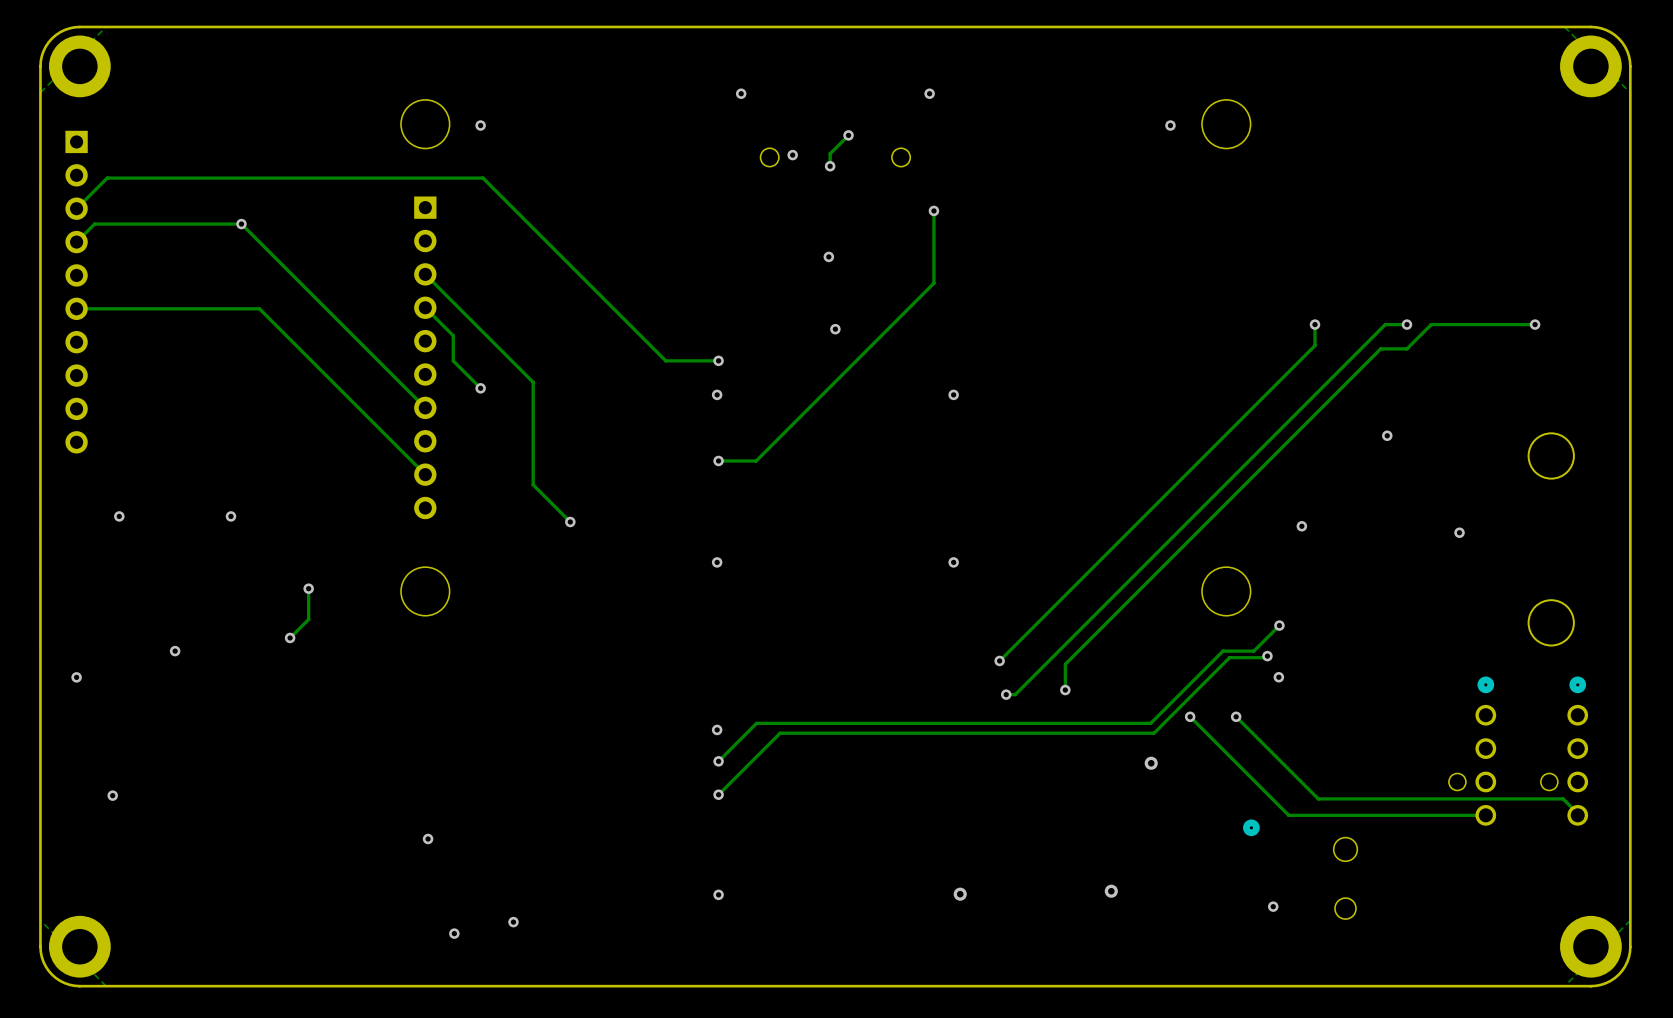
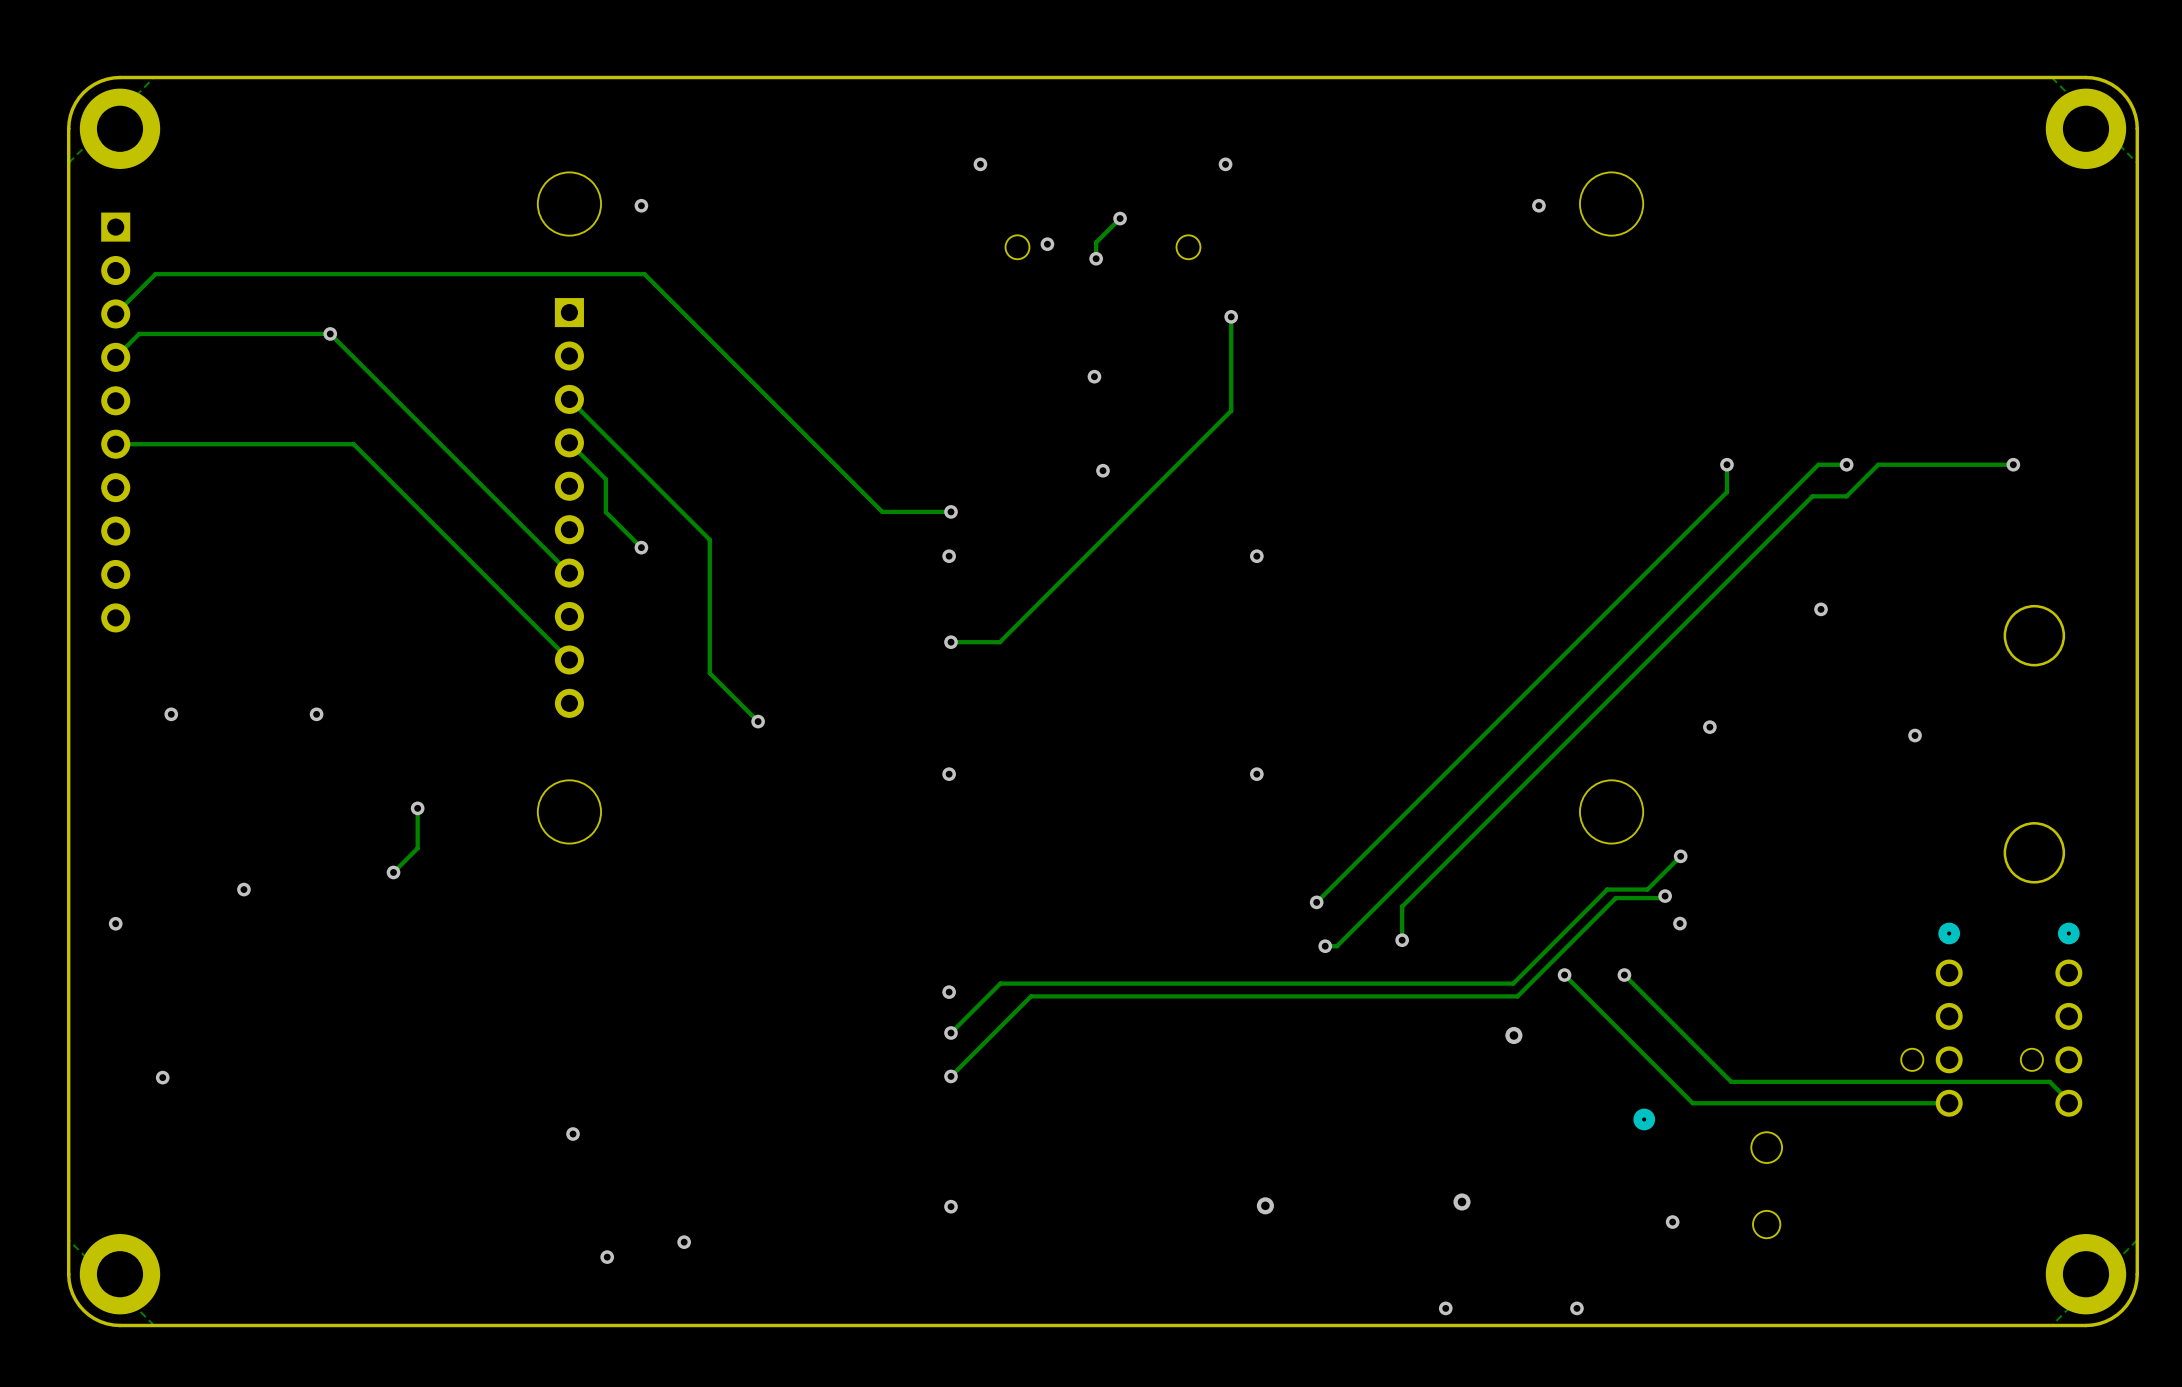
via: none -> (1445, 1308)
via: none -> (1576, 1308)

